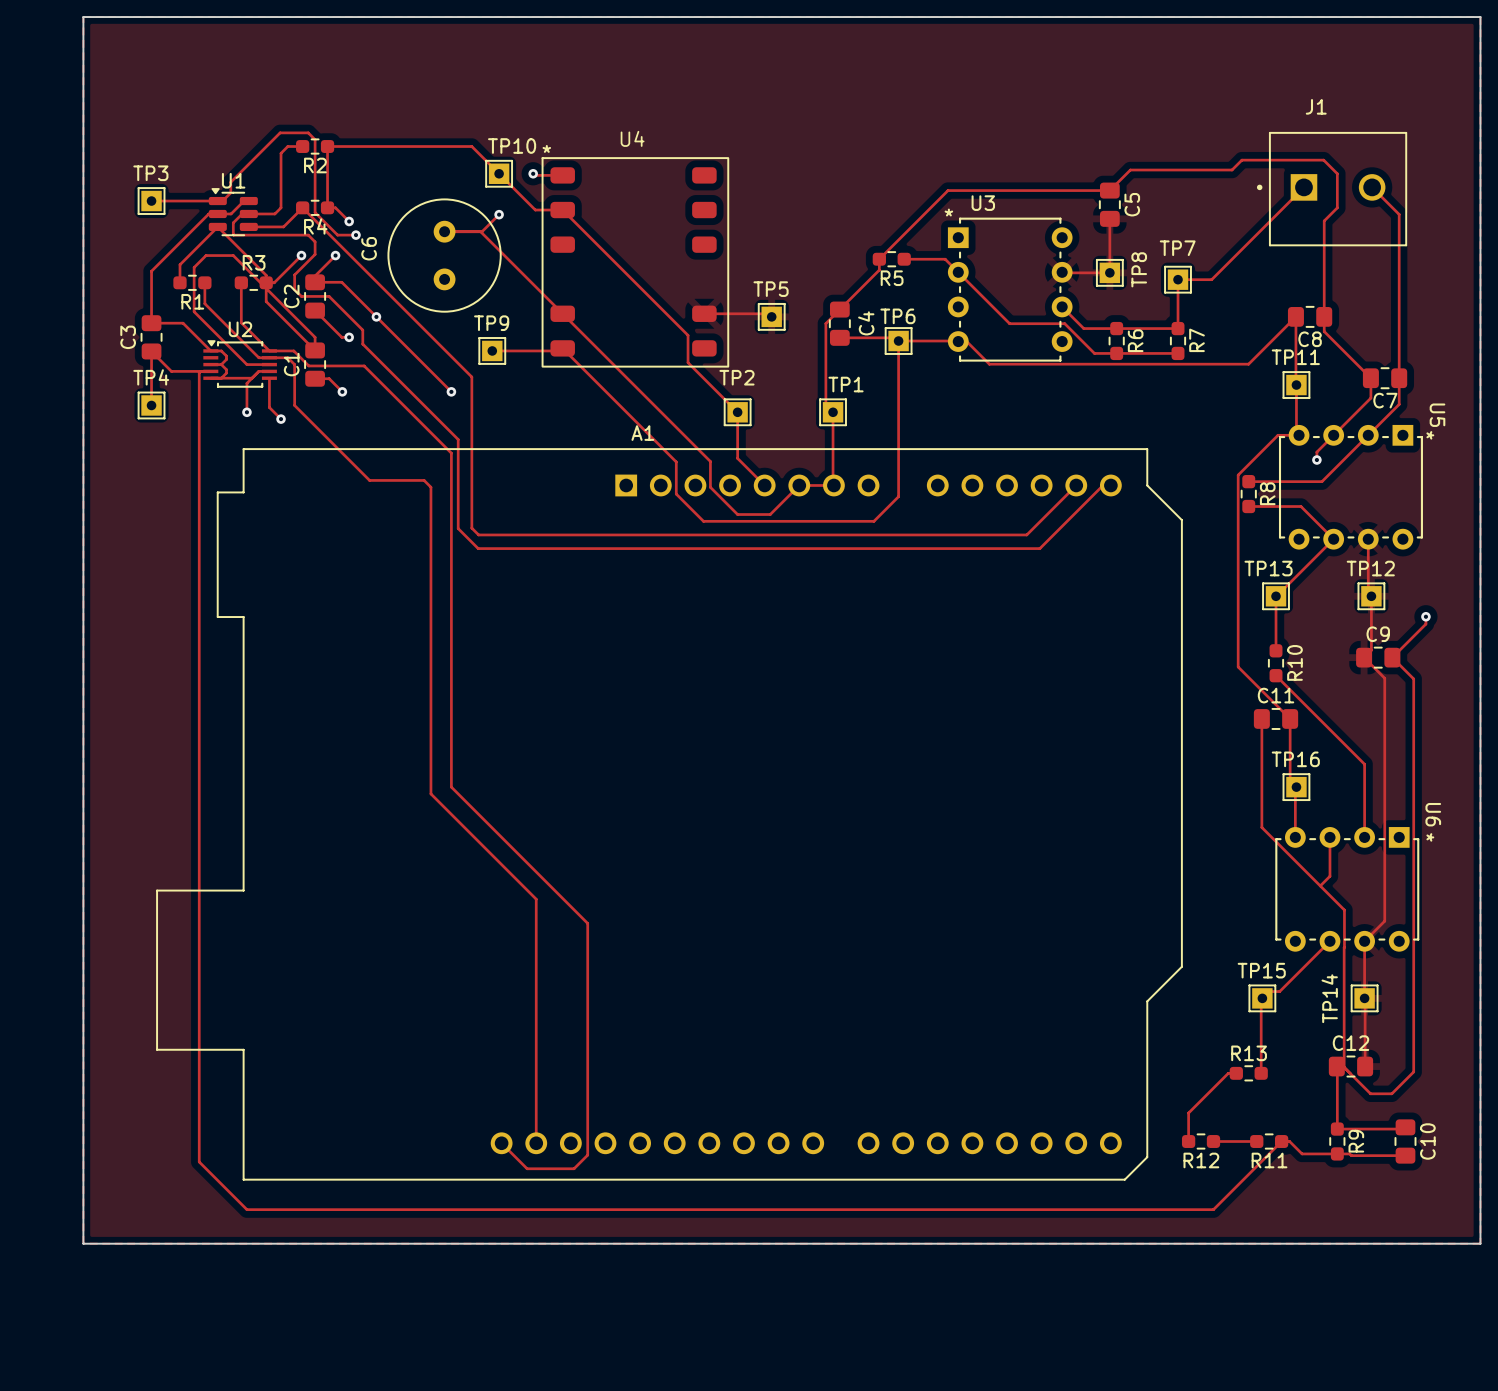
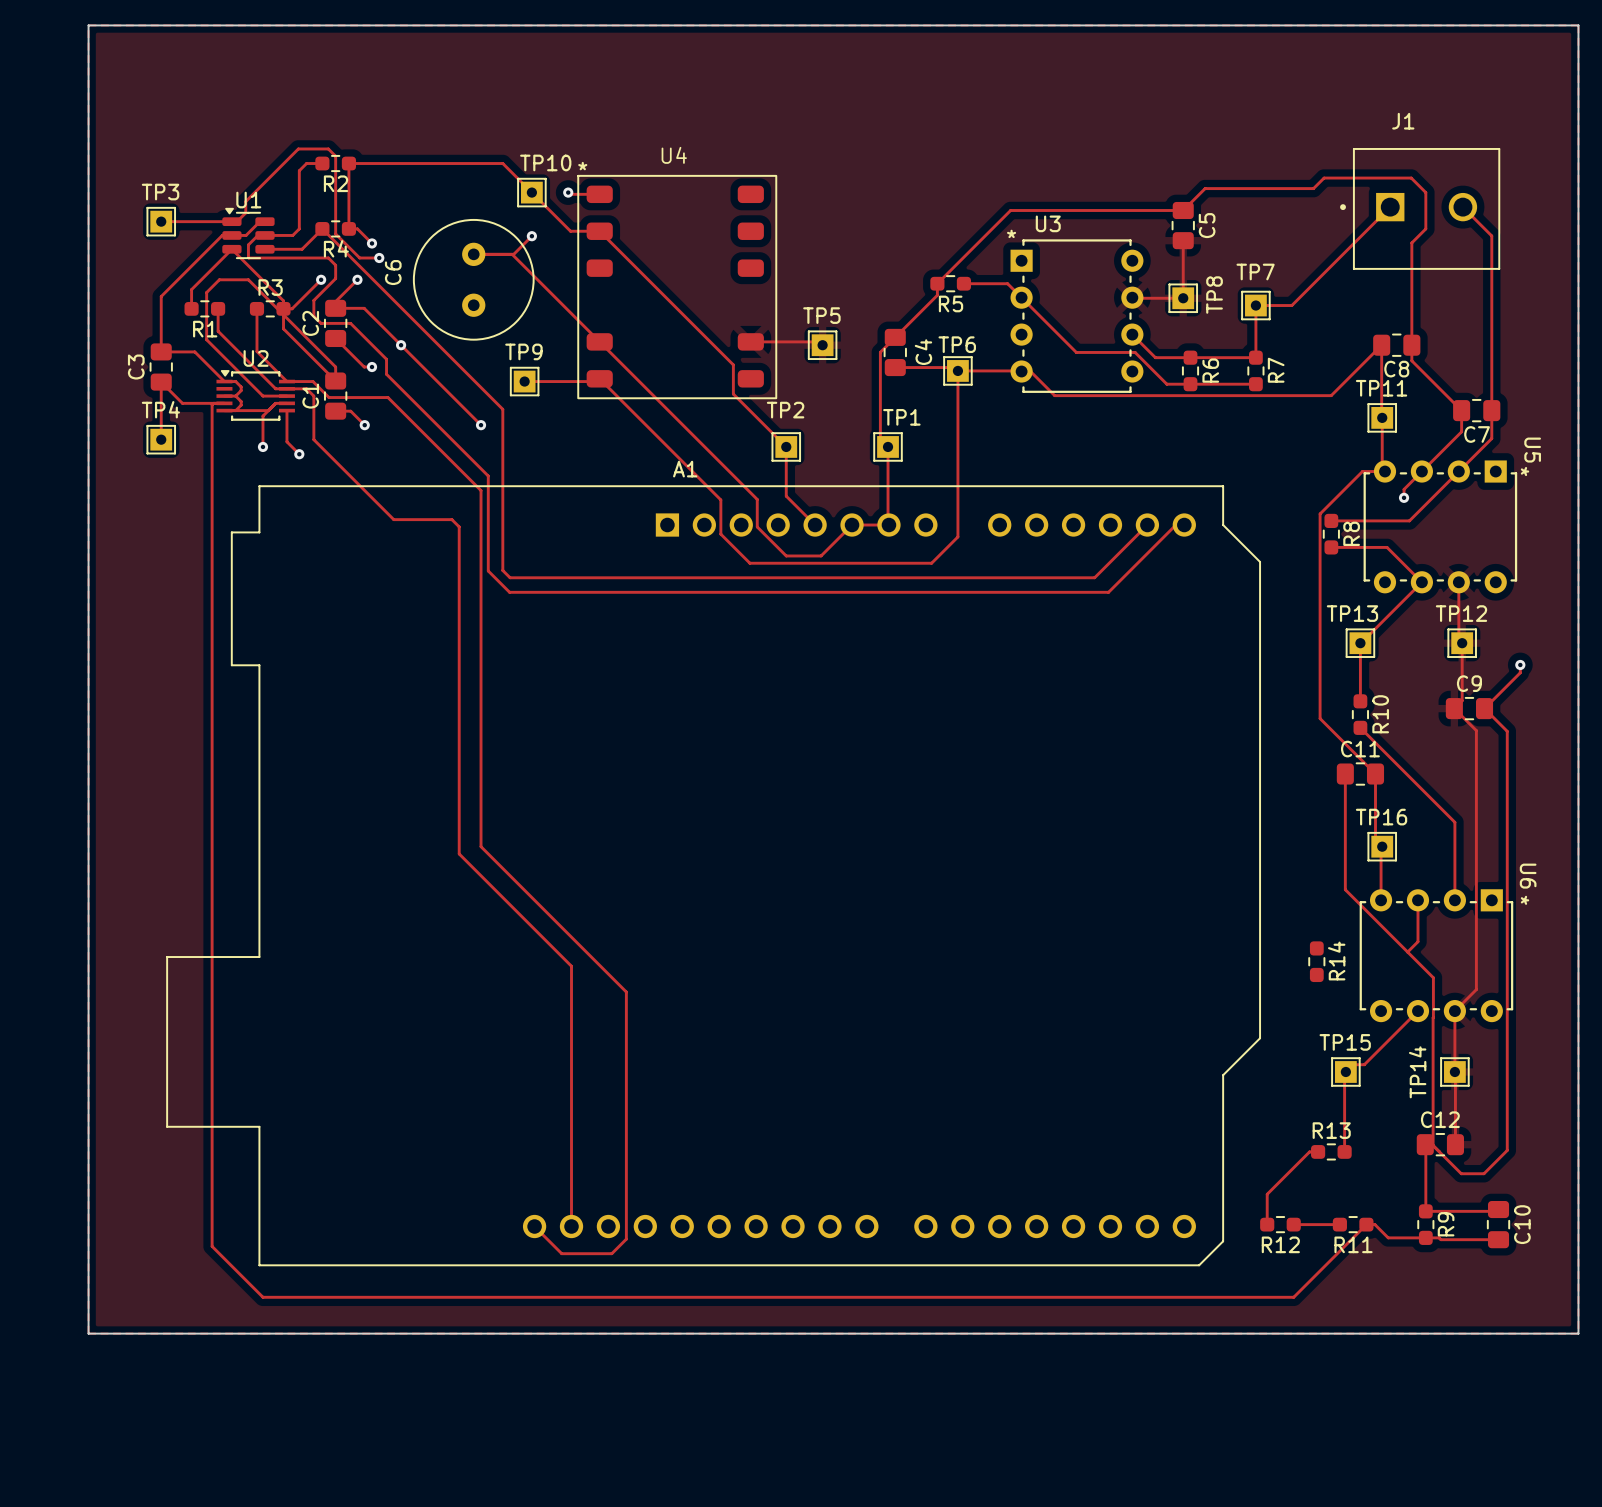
R14: none -> (1316, 961)

